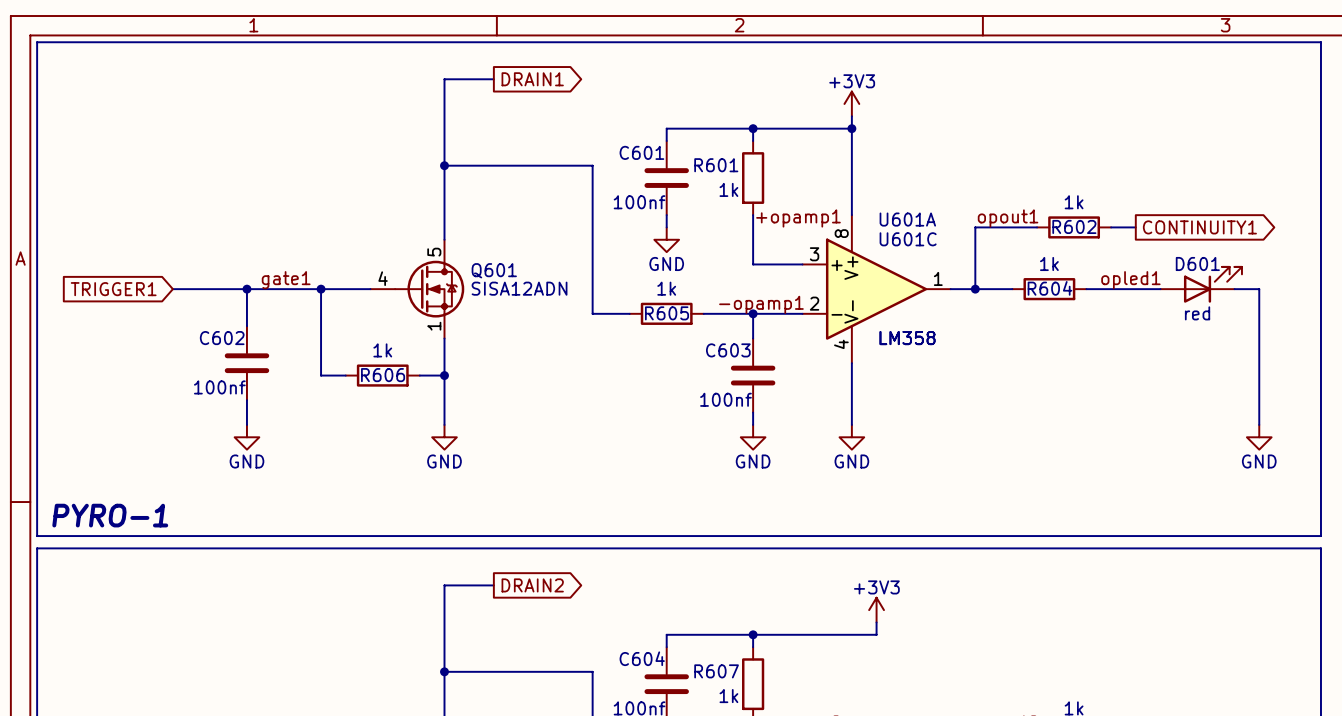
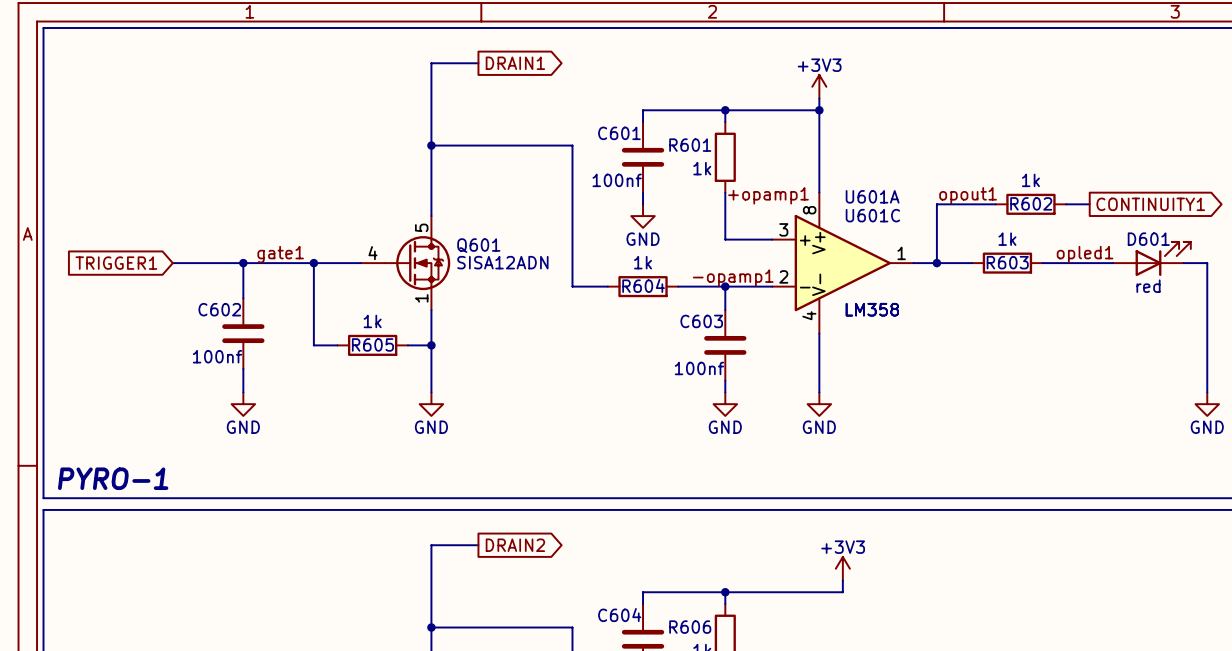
R604 name: R604 (1049, 288) -> R603 (1007, 262)
R605 name: R605 (667, 313) -> R604 (643, 285)
R606 name: R606 (383, 375) -> R605 (372, 344)
R607 name: R607 (716, 671) -> R606 (690, 627)

